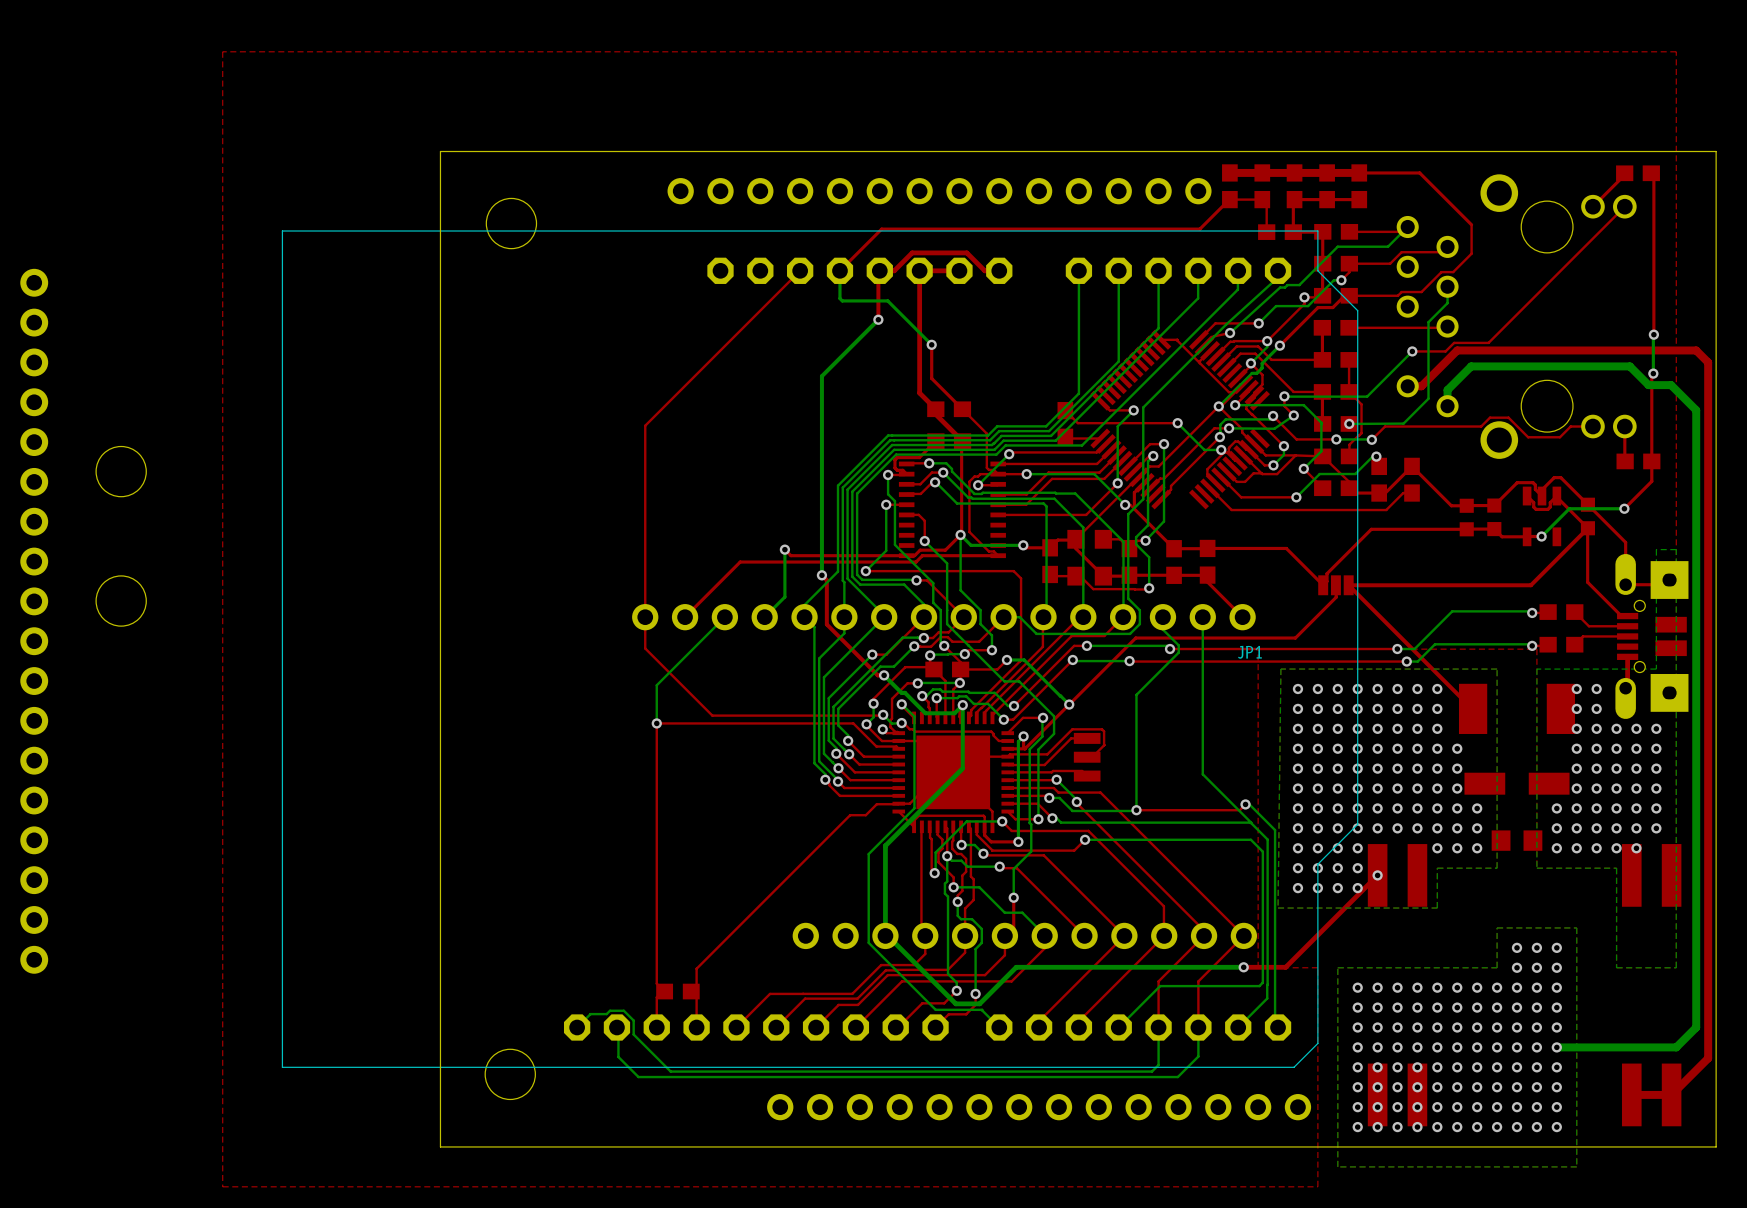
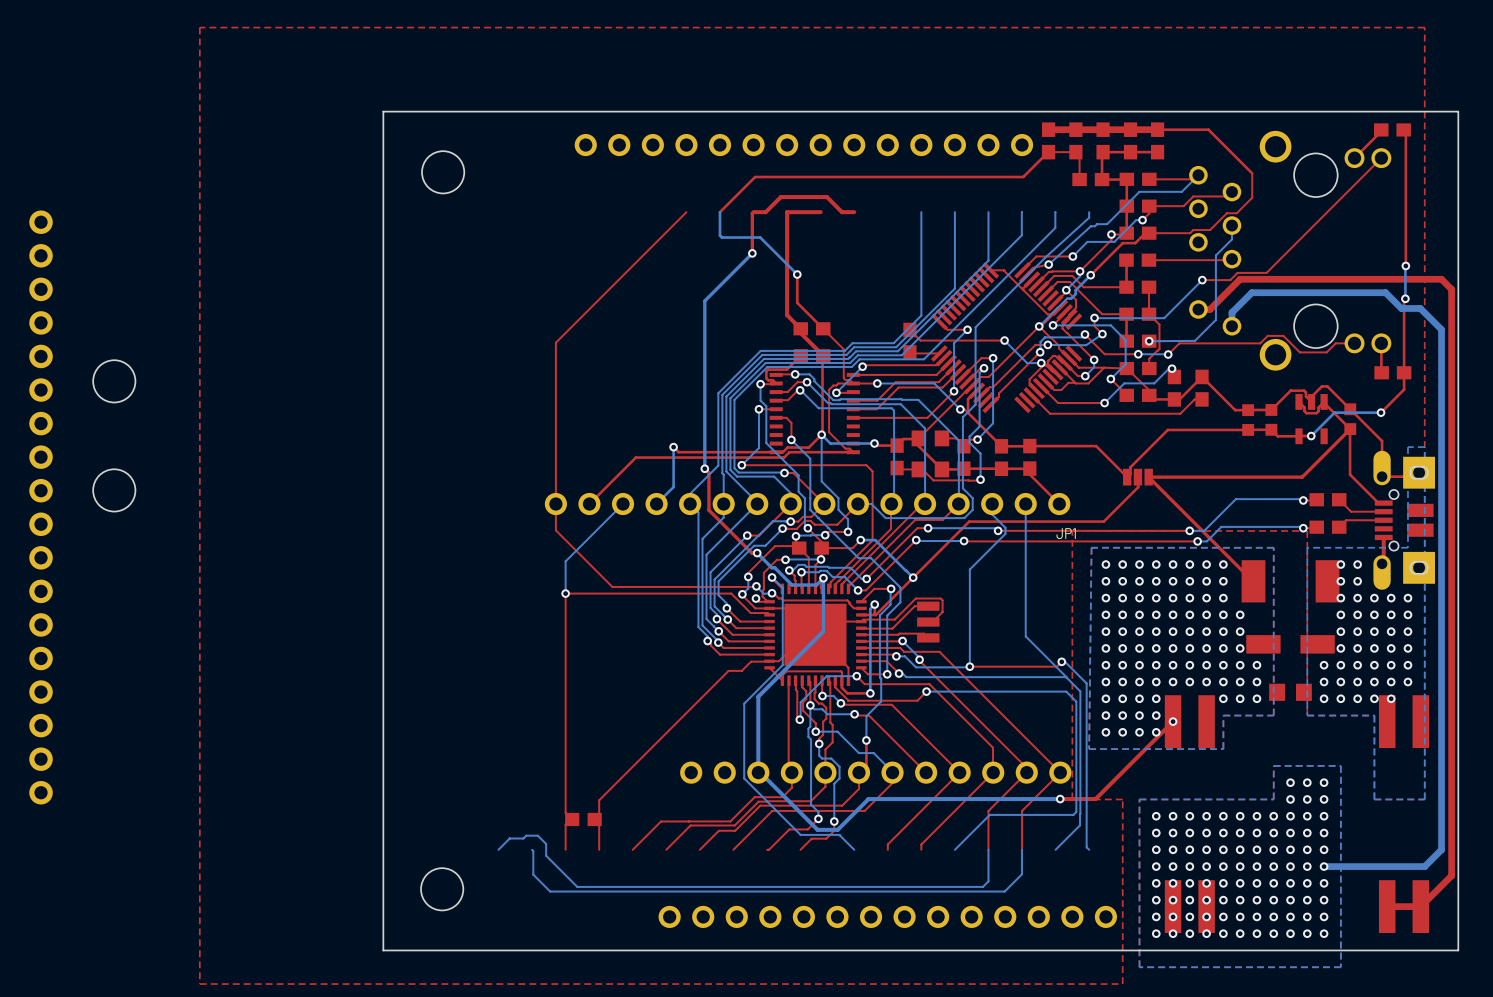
part: (820, 649) -> none

